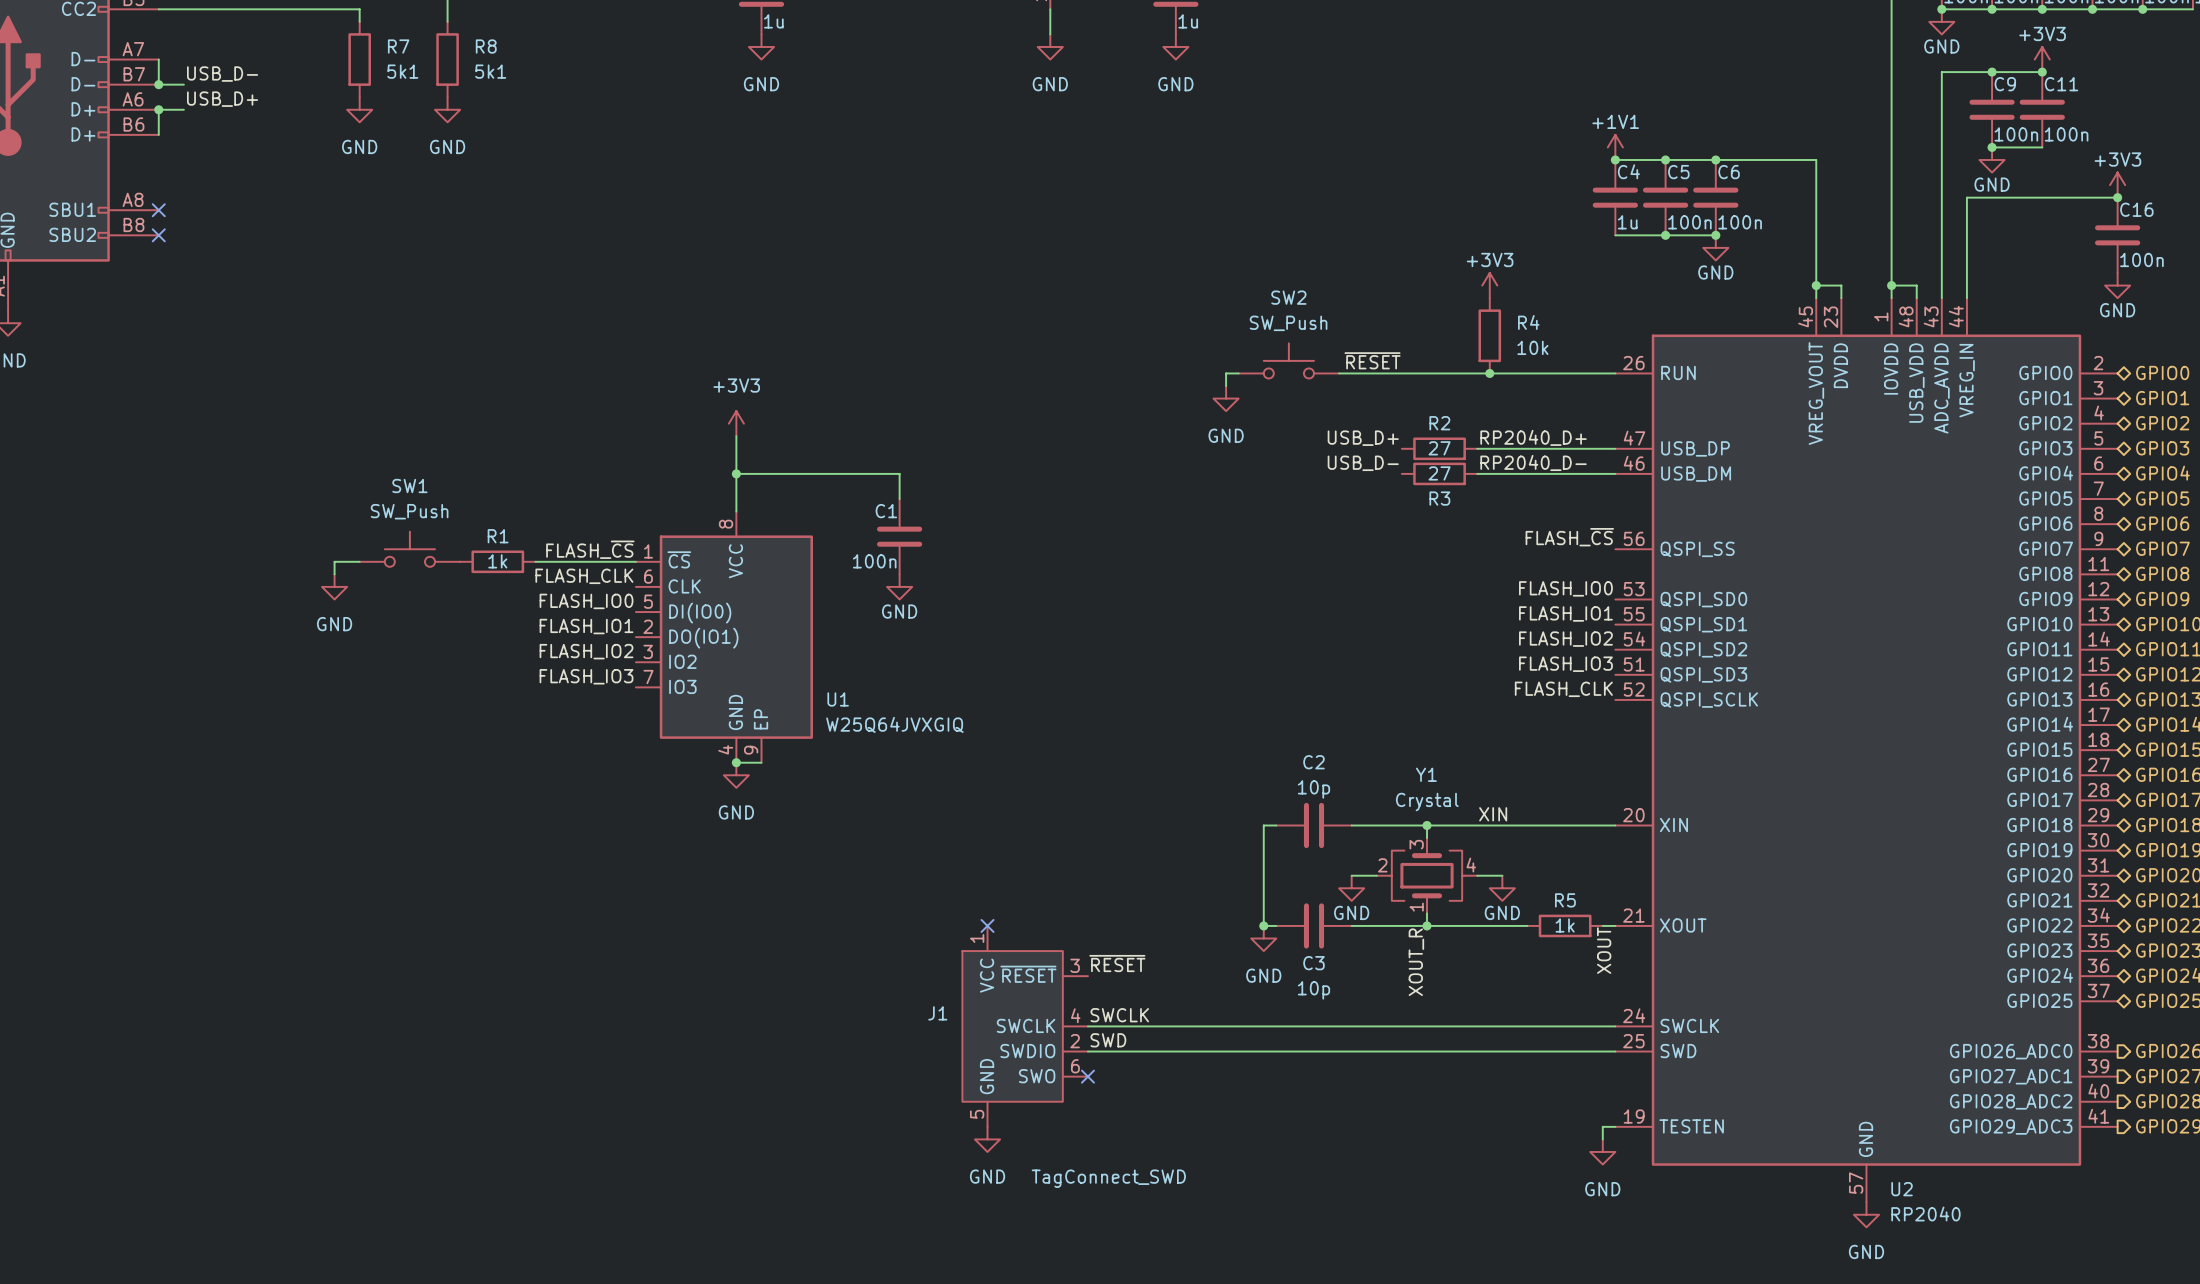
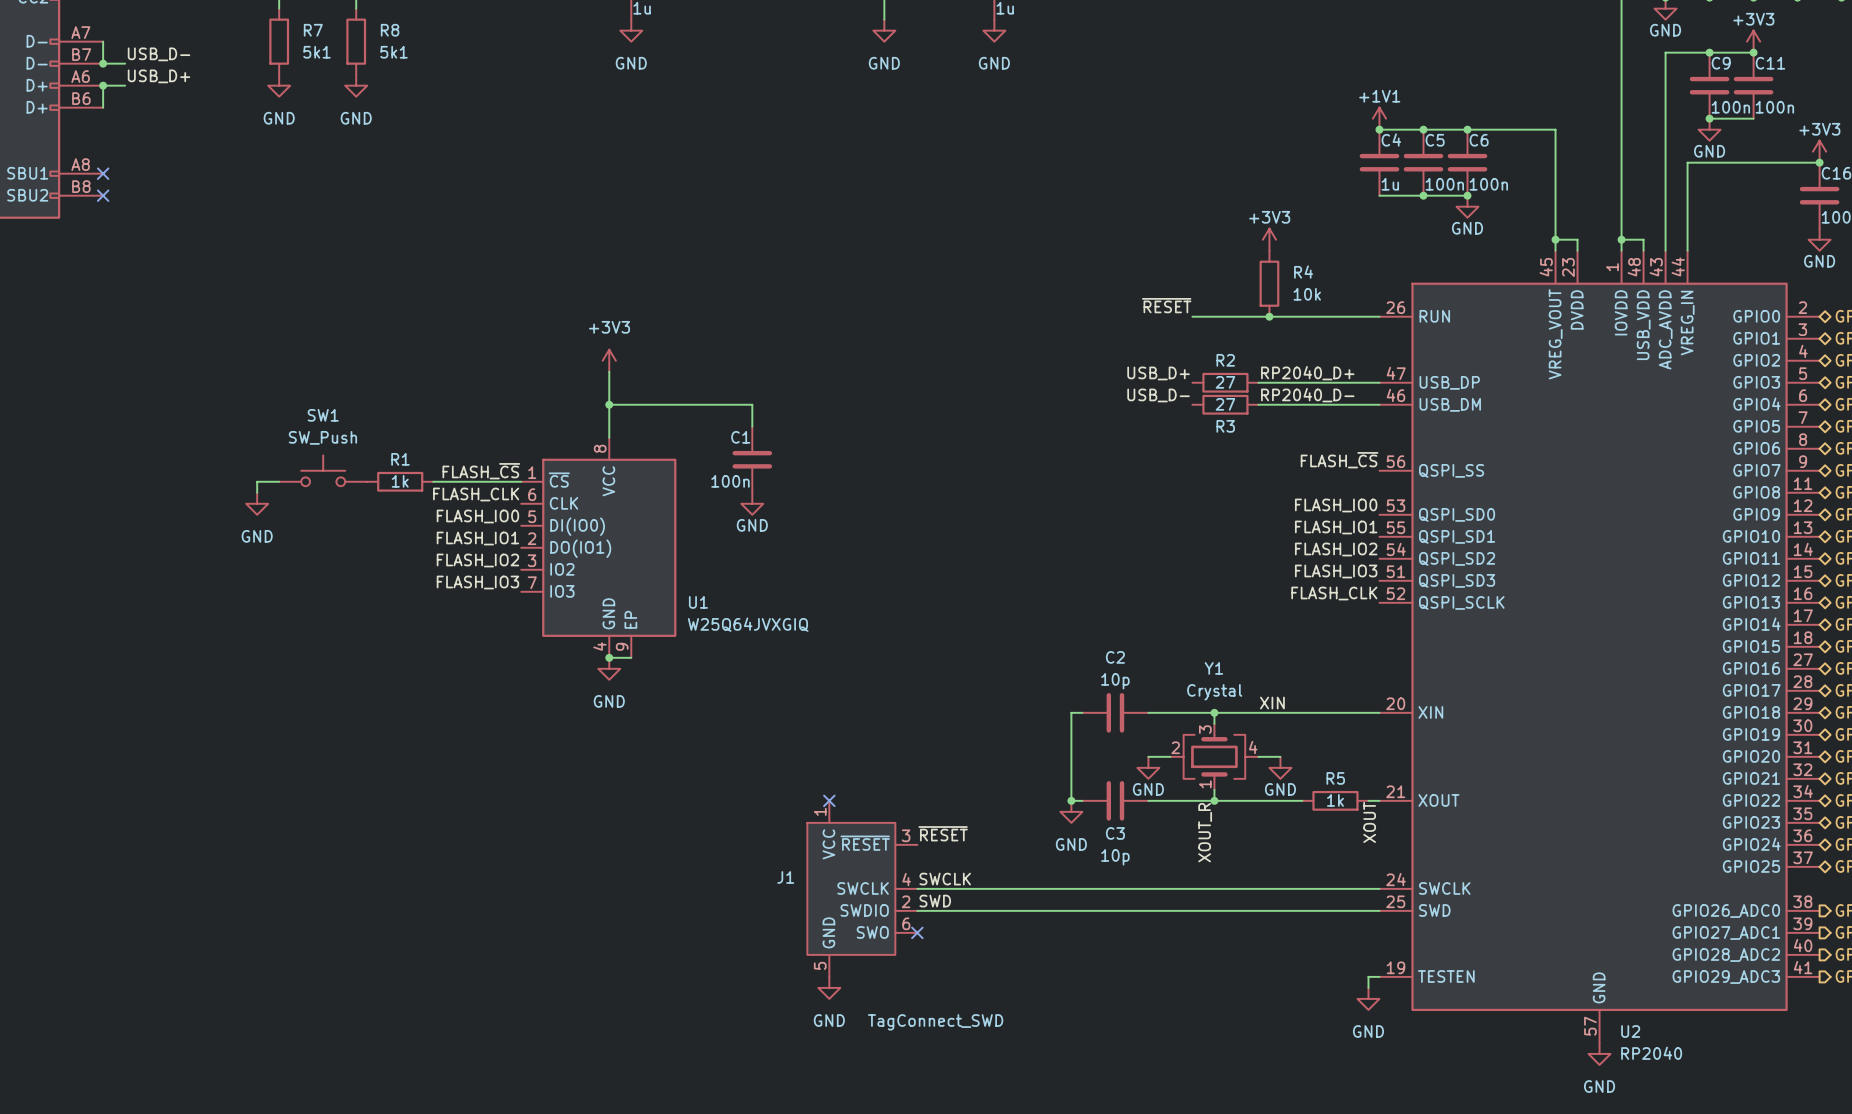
SW2: SW_Push (1288, 360) -> none
wire: (1238, 373) (1226, 373) (1226, 386) -> none
wire: (1339, 373) (1401, 373) -> none
power symbol: GND (1226, 398) -> none

